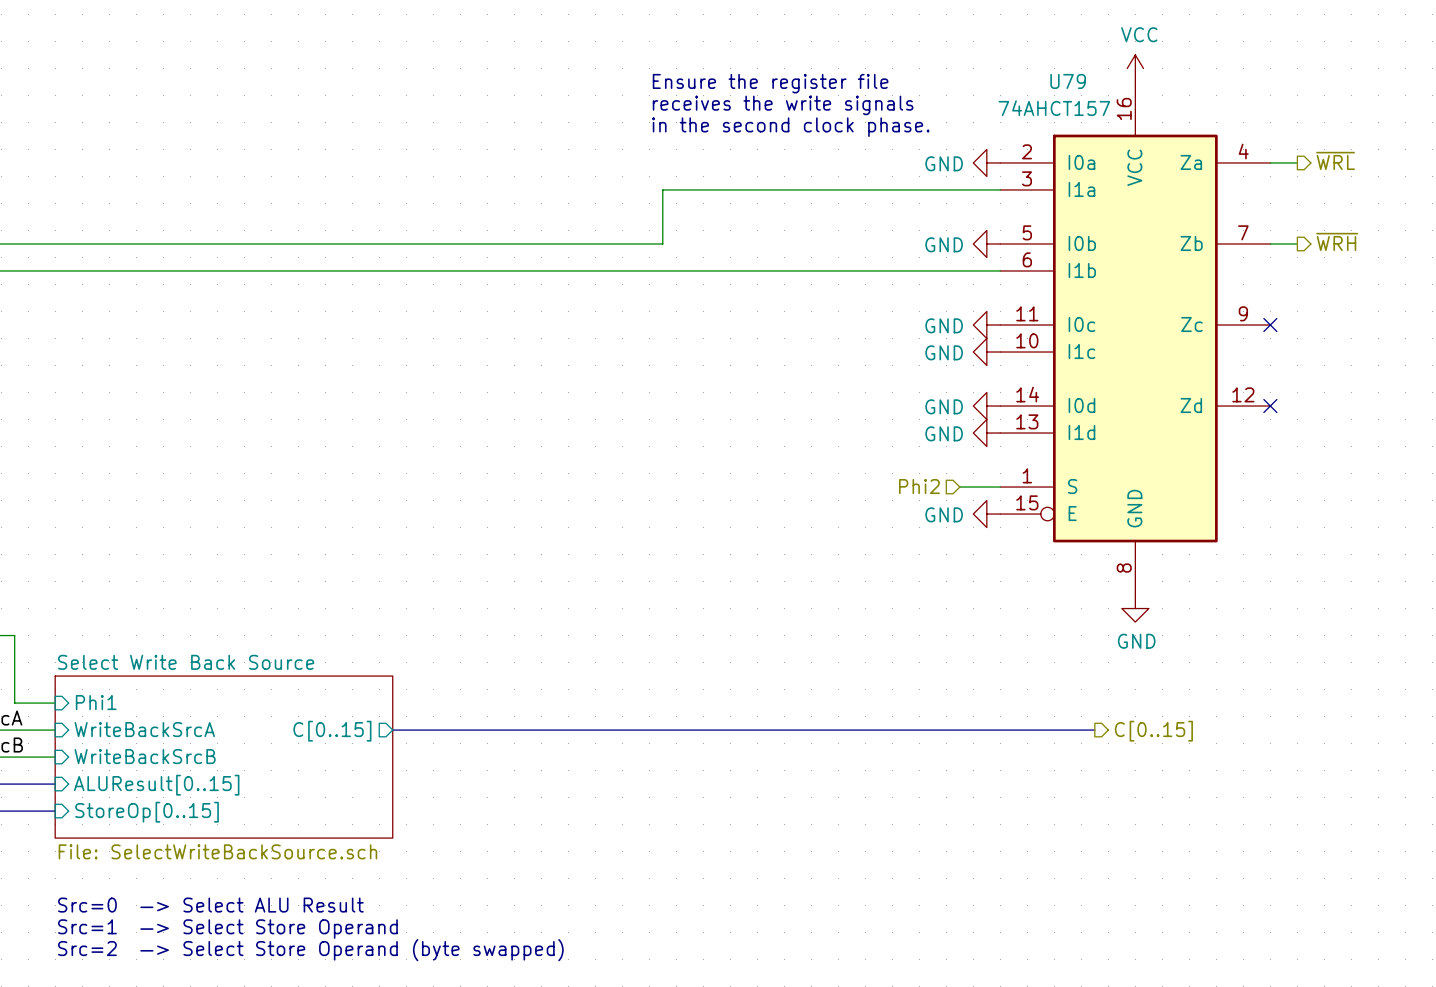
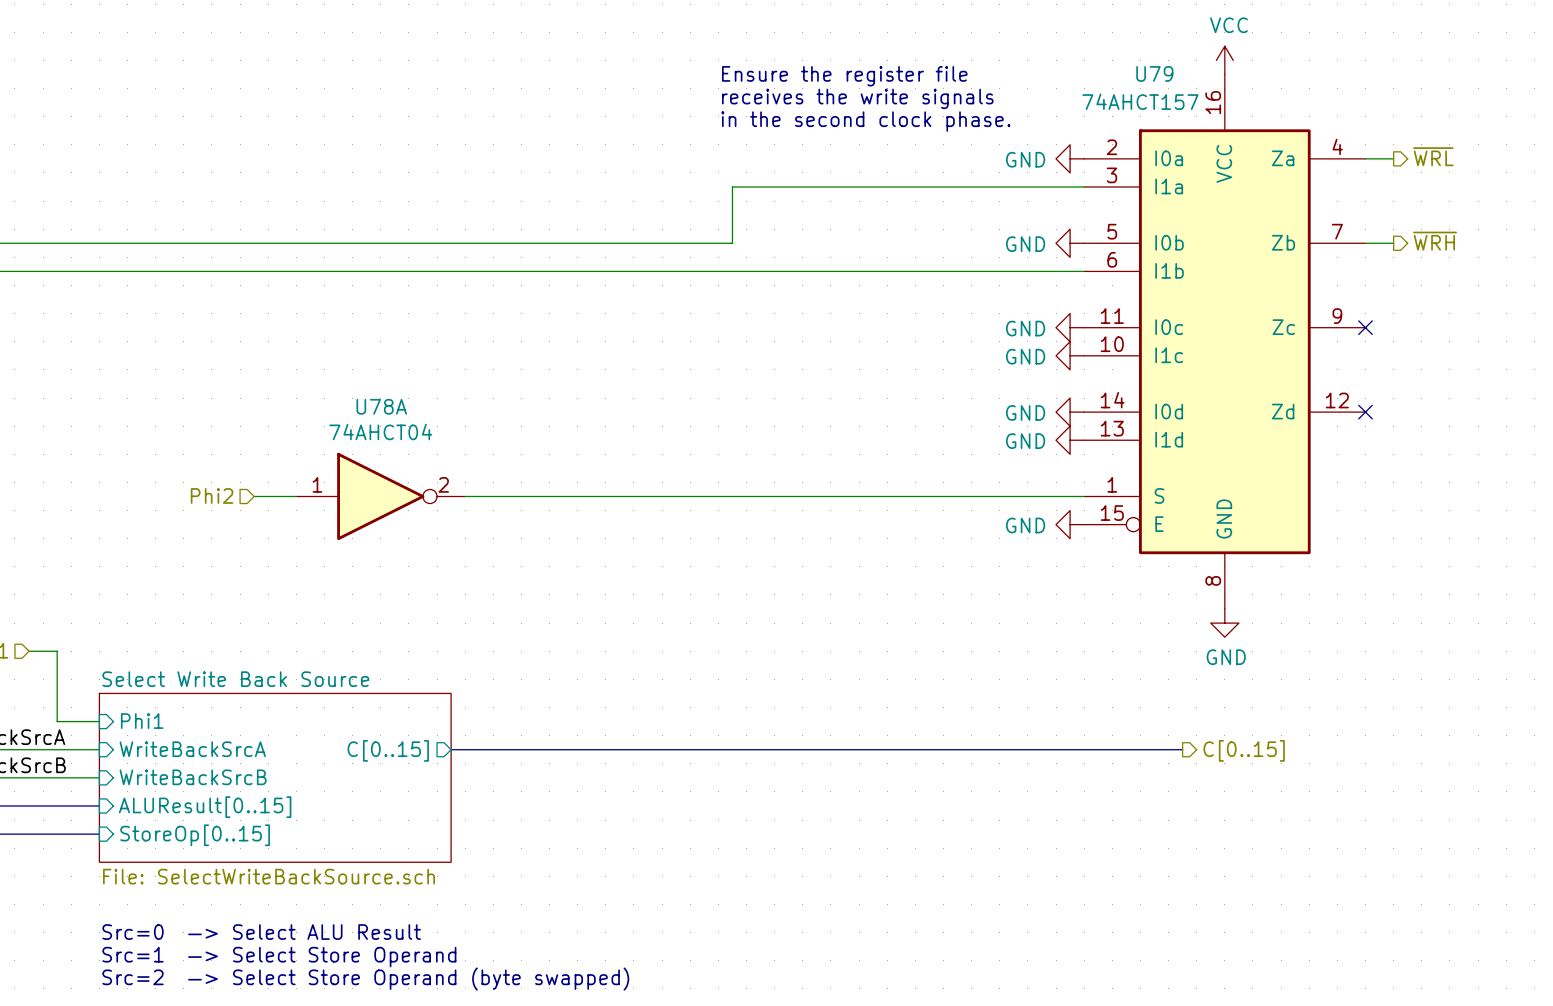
hierarchical label: none -> Phi2 (212, 495)
hierarchical label: Phi2 (919, 486) -> none
wire: none -> (254, 496) (296, 496)
U78A: none -> 74AHCT04 (380, 496)
wire: none -> (465, 496) (1041, 496)

